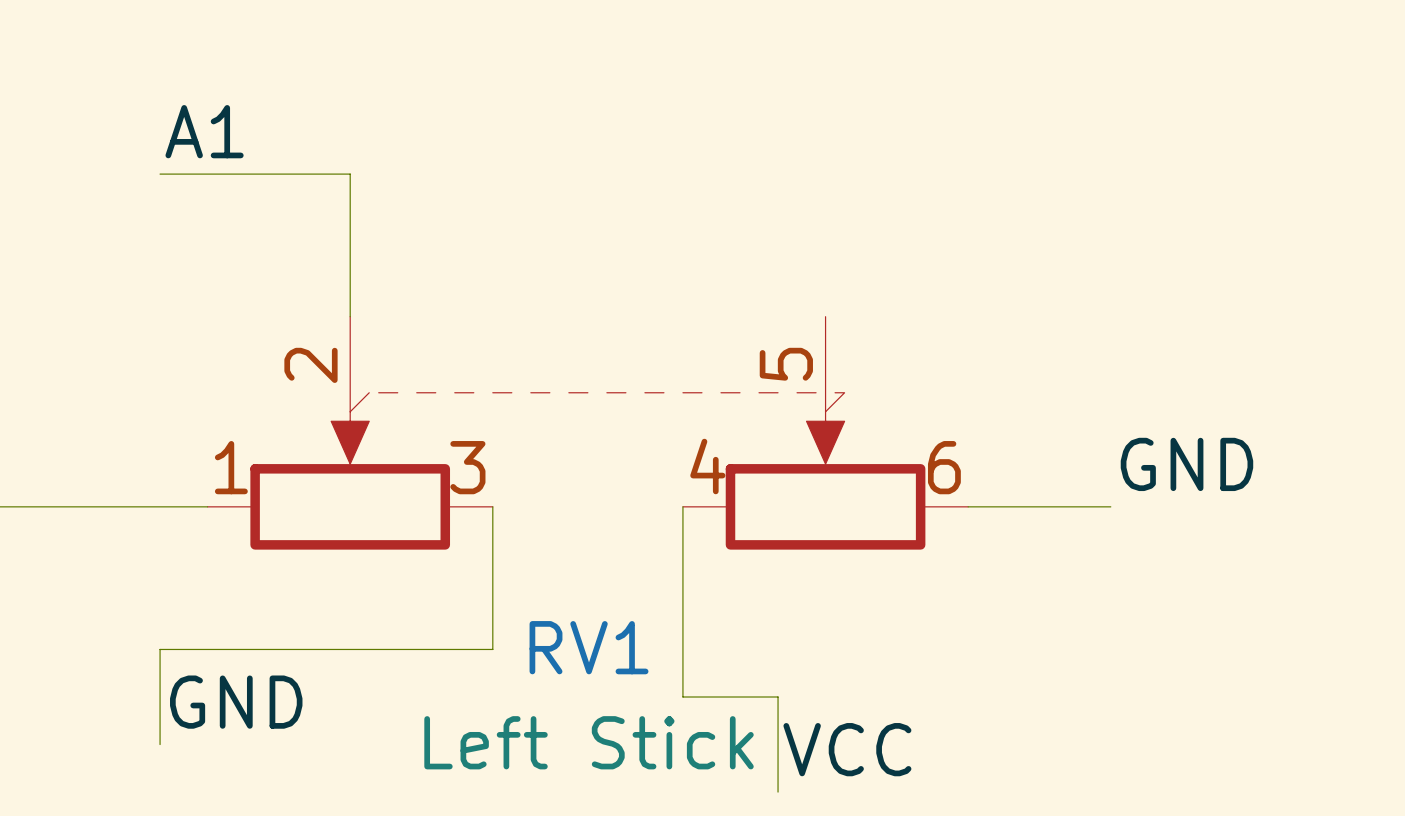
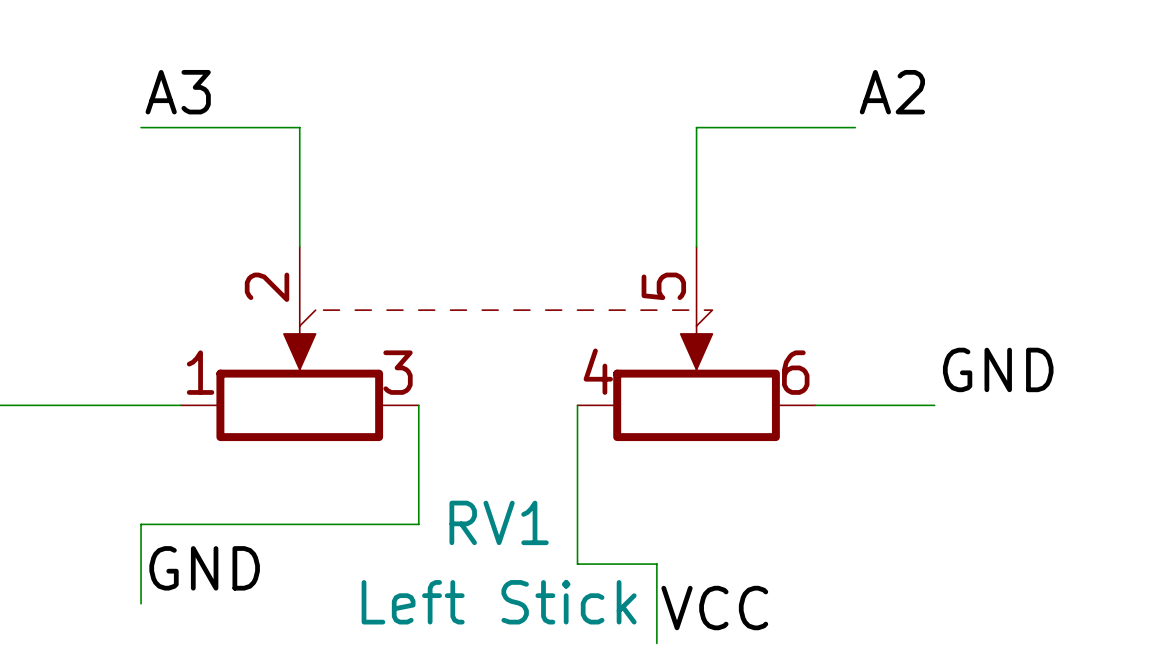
label: A1 (204, 131) -> A3 (178, 92)
label: none -> A2 (892, 92)
wire: none -> (855, 127) (696, 127) (696, 246)

